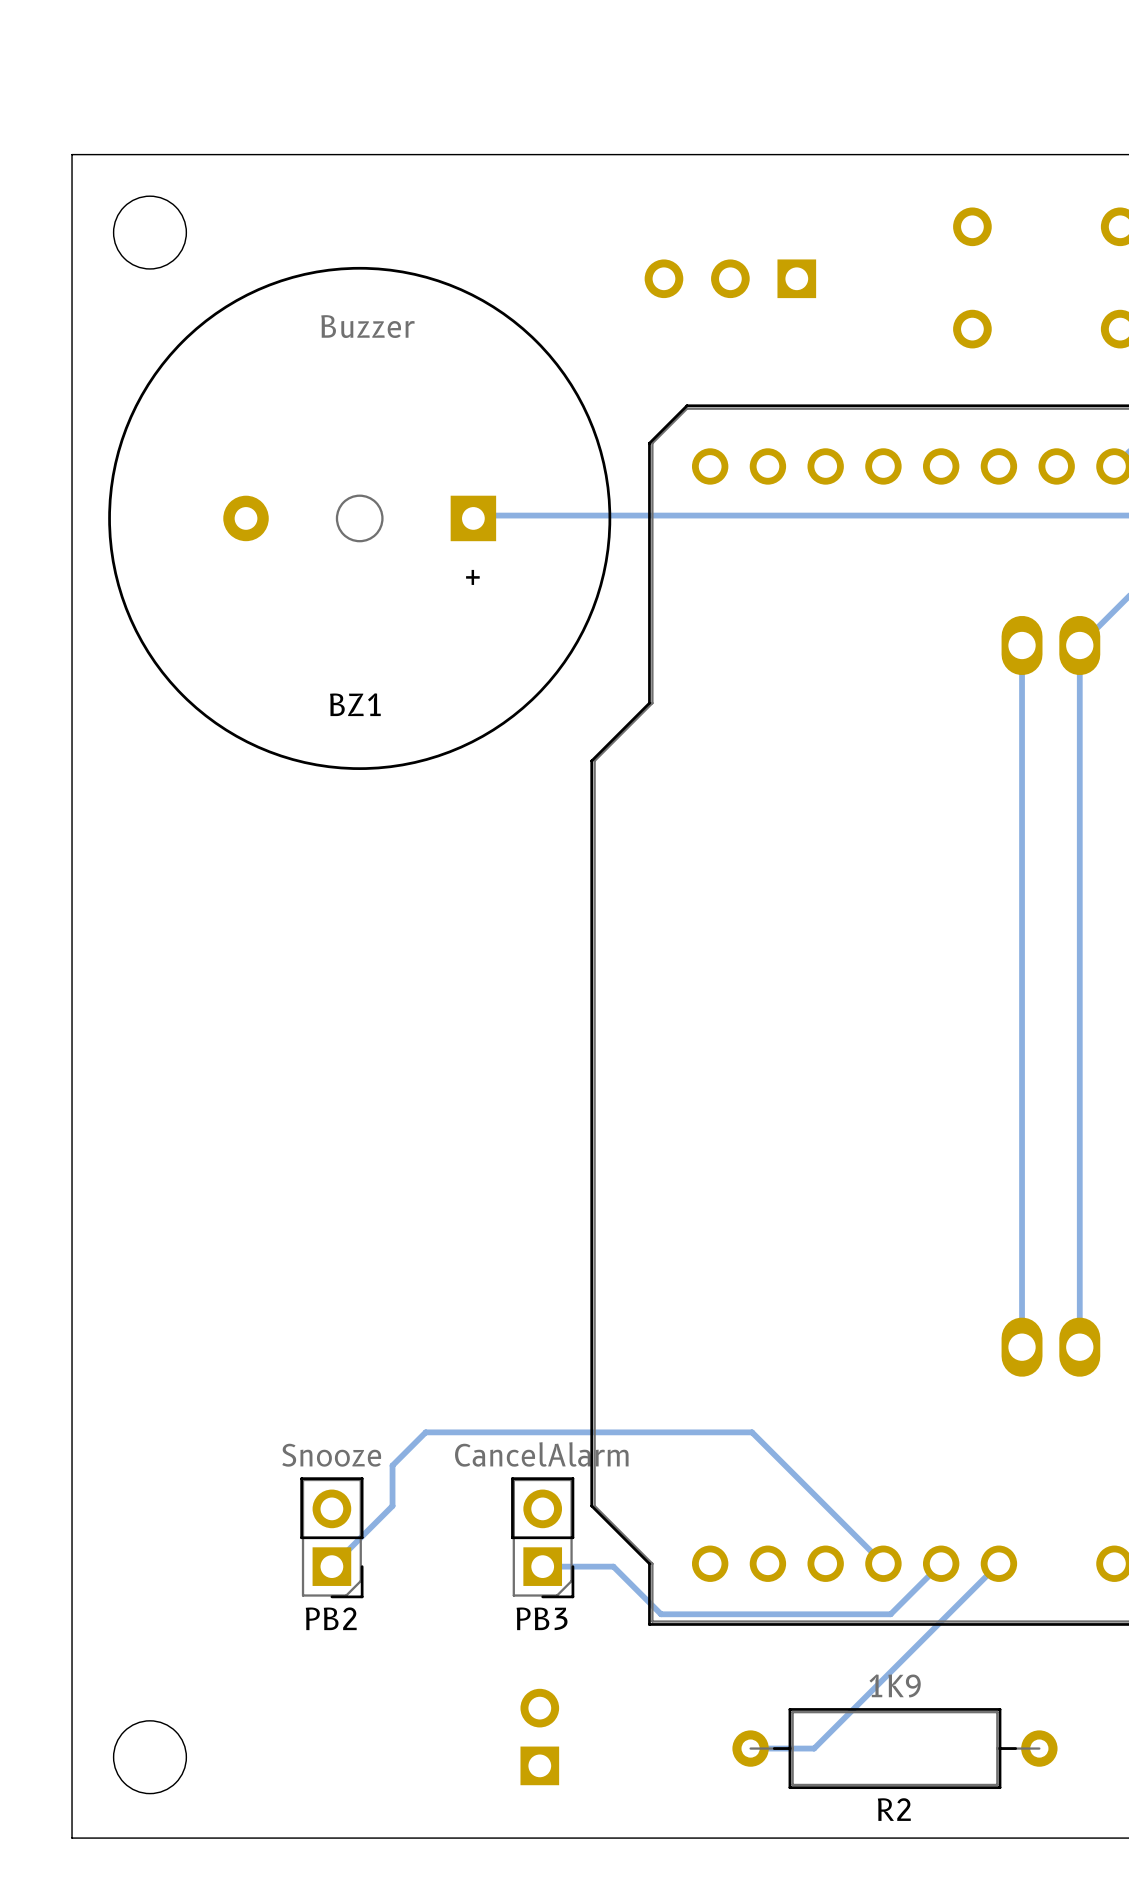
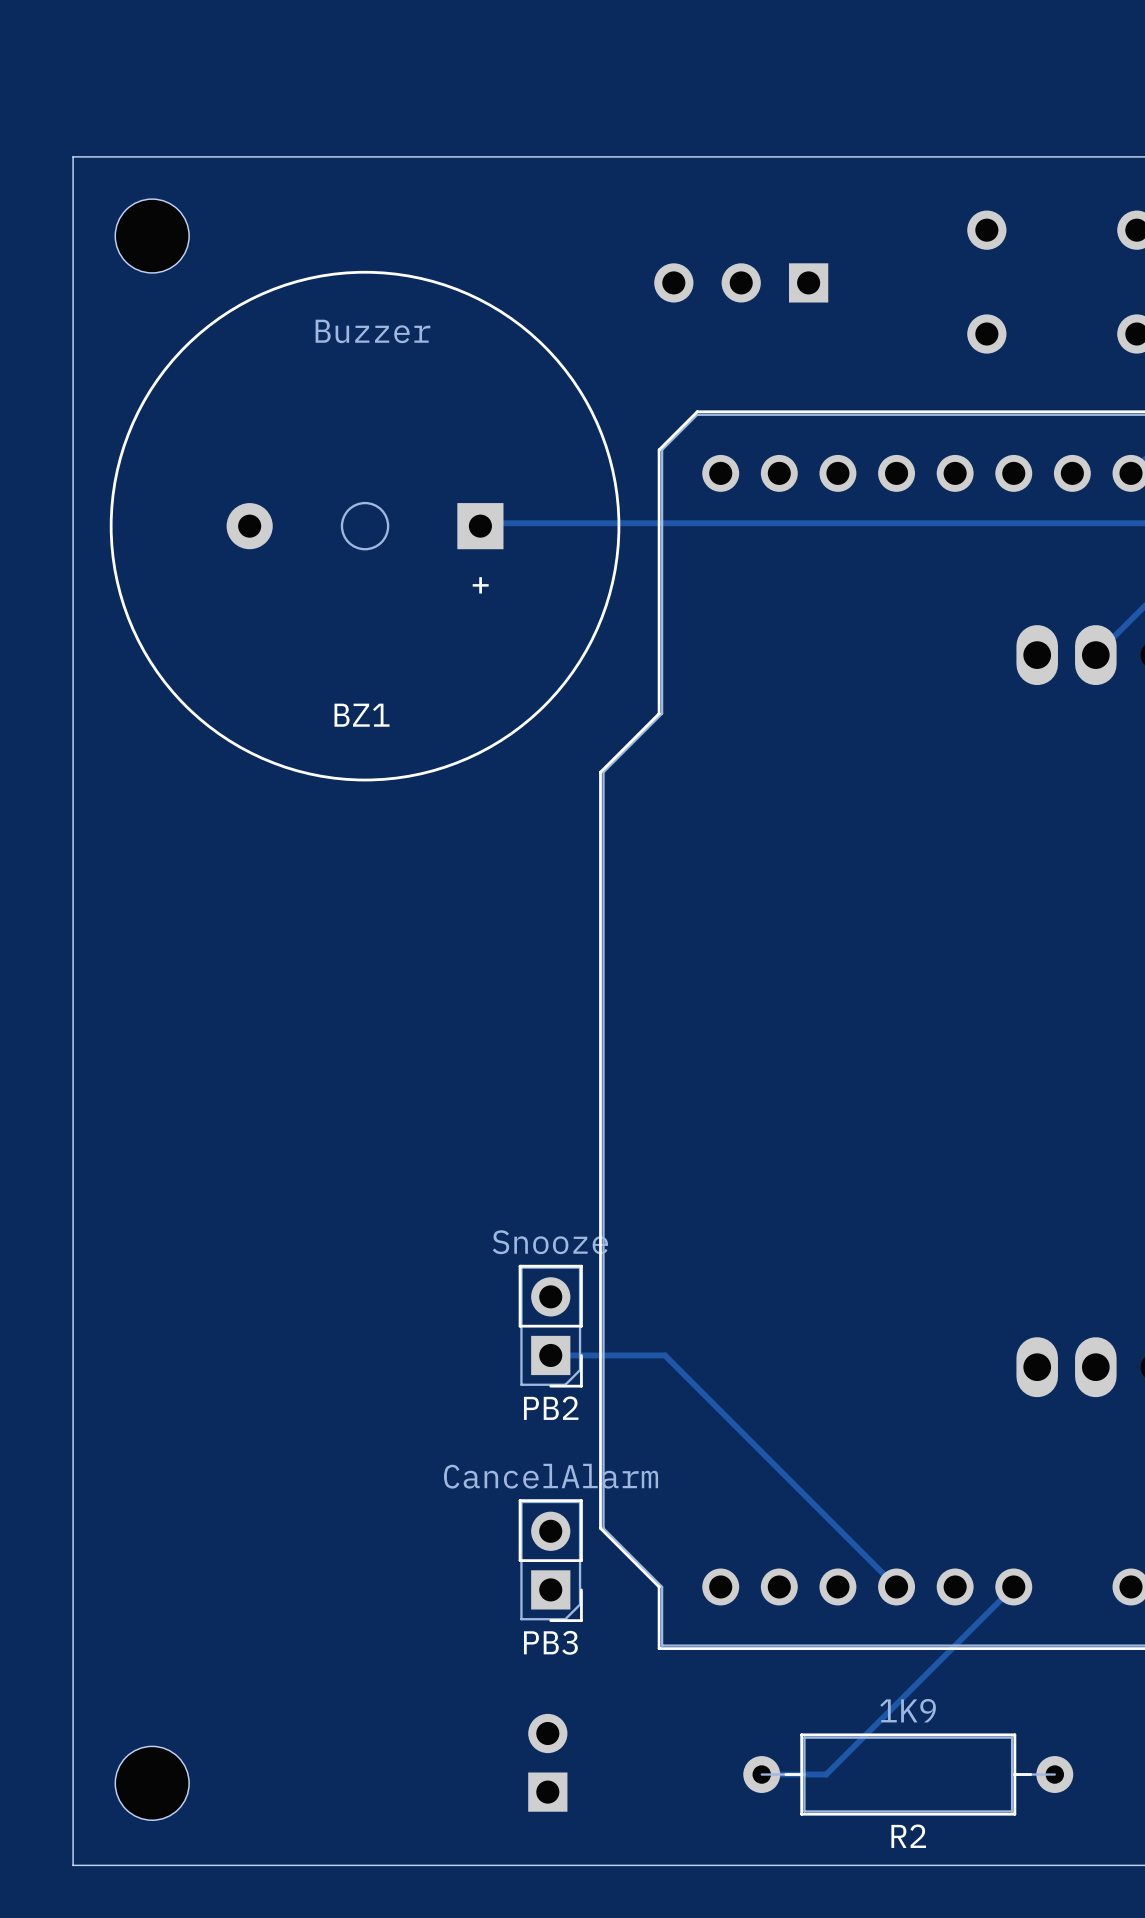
track: (1022, 645) (1022, 1347) -> none
track: (1079, 645) (1079, 1347) -> none
track: (752, 1432) (425, 1432) (392, 1465) (392, 1505) (331, 1566) -> (763, 1453) (665, 1355) (550, 1355)
PB2 position: (331, 1537) -> (550, 1326)
track: (941, 1563) (890, 1614) (661, 1614) (613, 1566) (542, 1566) -> none

